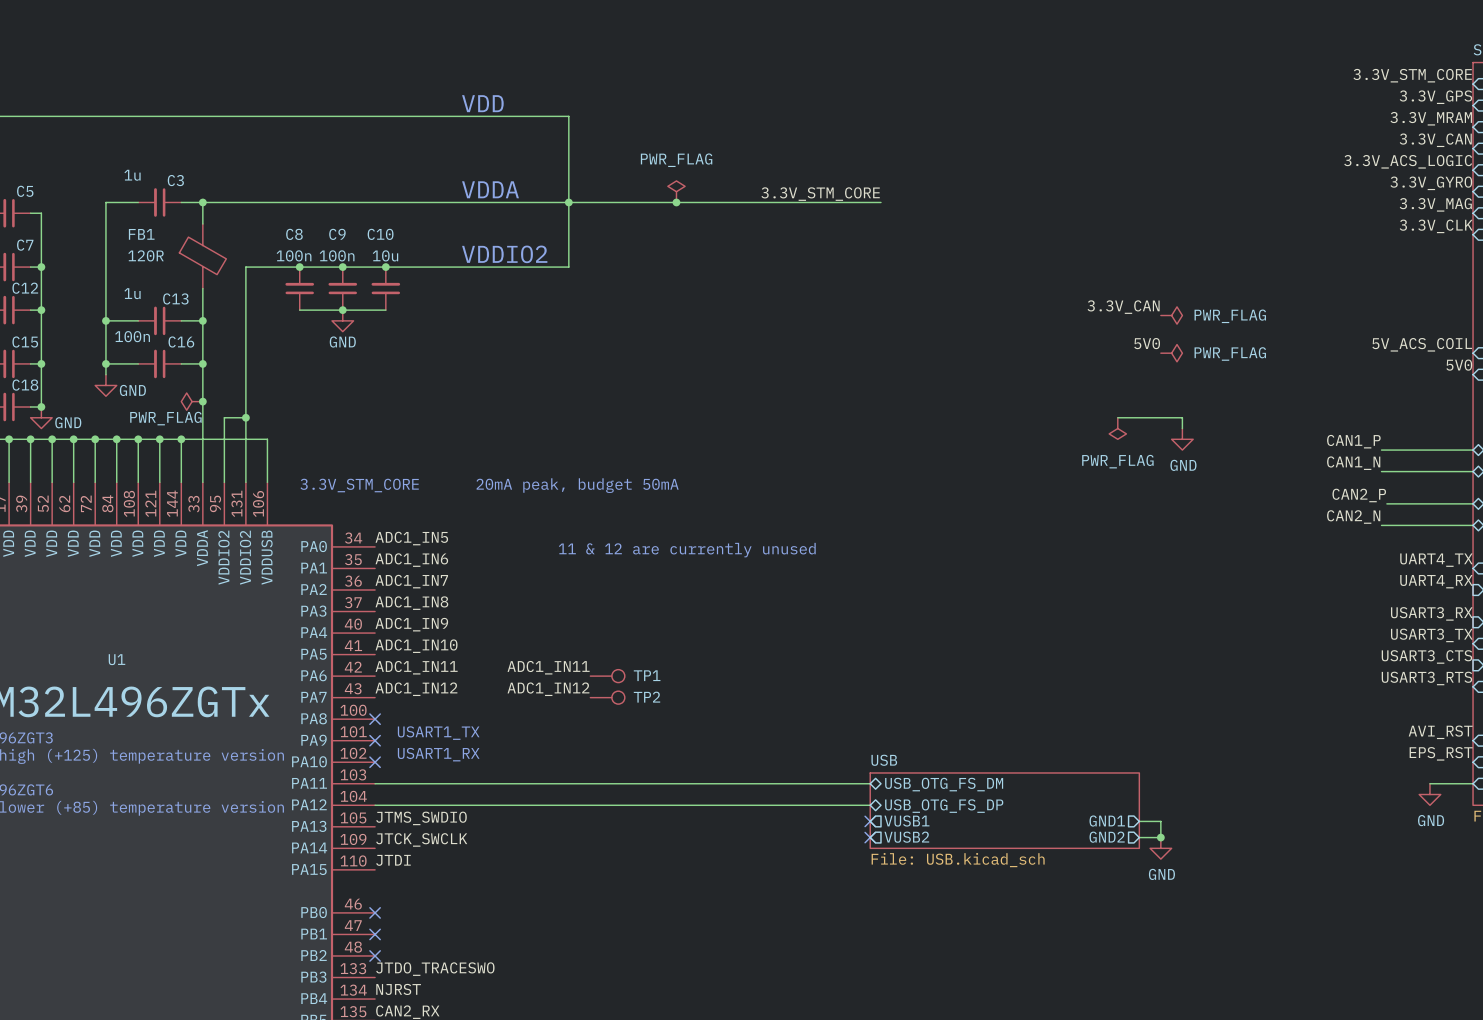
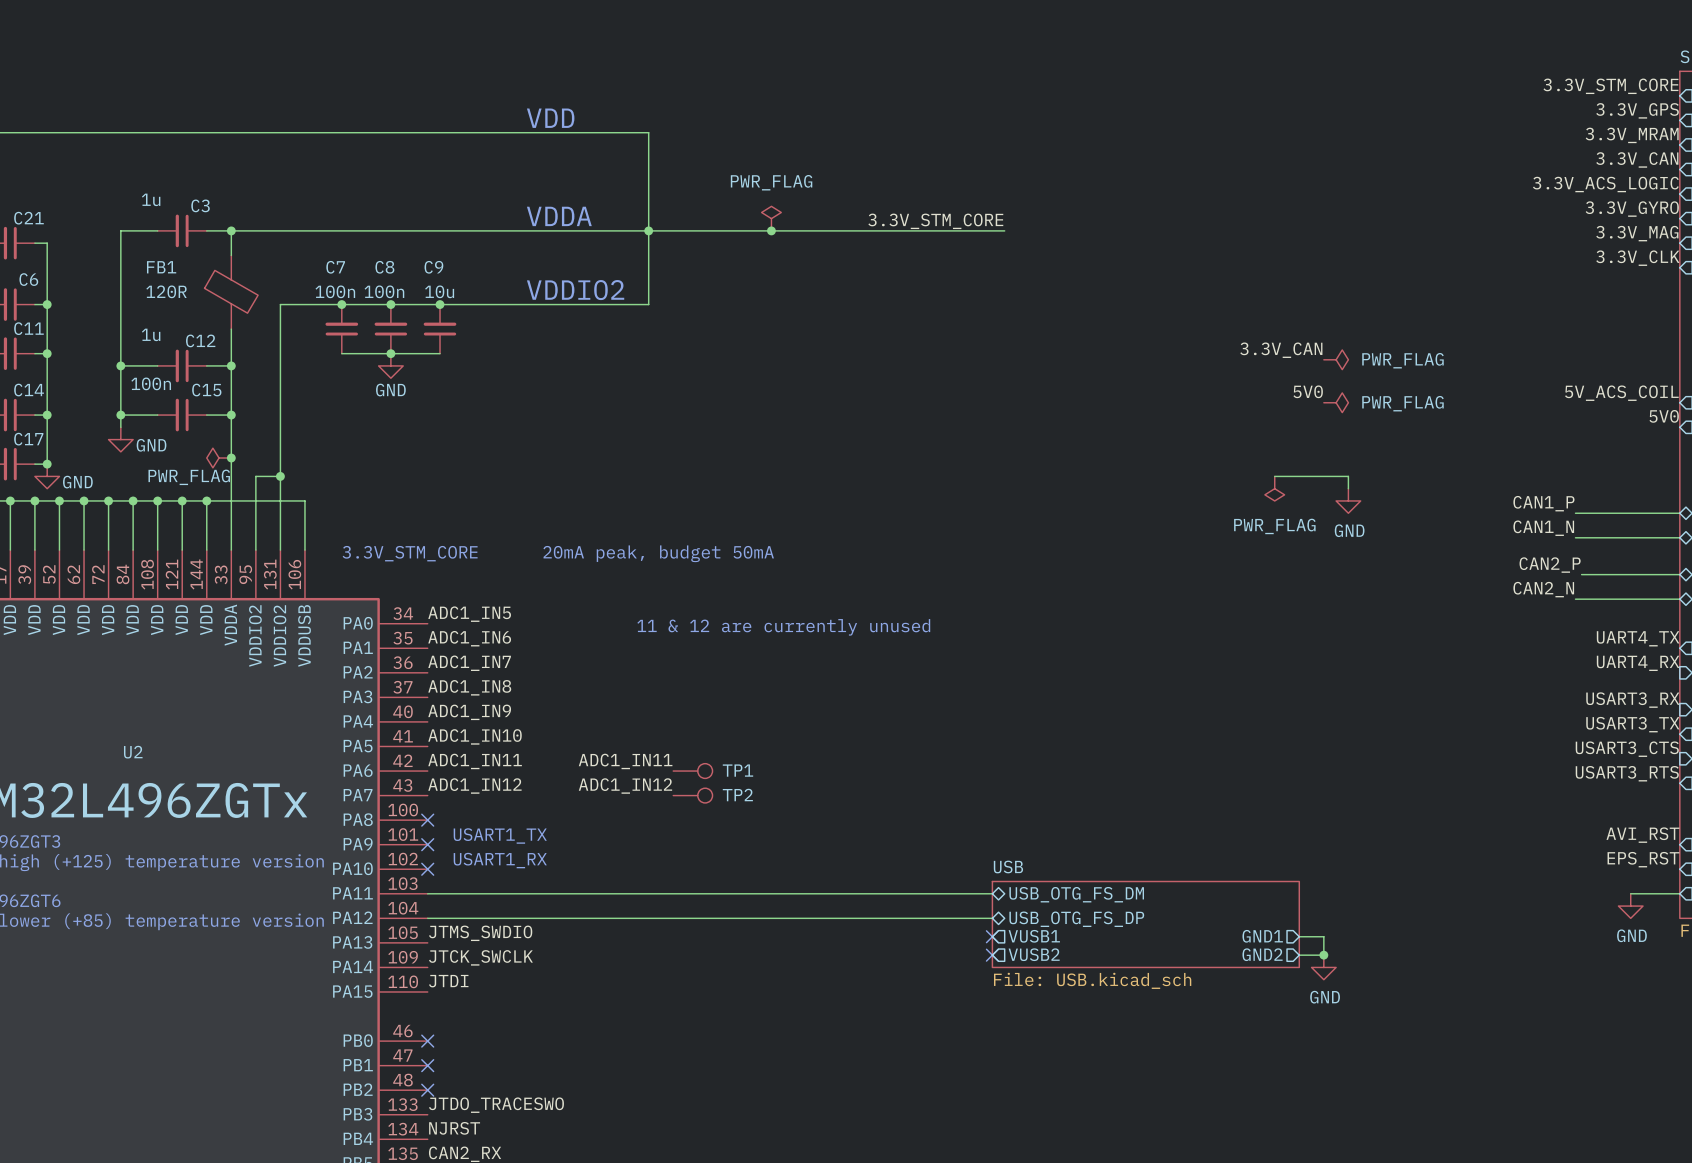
C5 name: C5 (25, 191) -> C21 (28, 218)
C8 name: C8 (294, 234) -> C7 (335, 267)
C9 name: C9 (337, 234) -> C8 (384, 267)
C10 name: C10 (380, 234) -> C9 (433, 267)
C7 name: C7 (25, 245) -> C6 (28, 279)
C12 name: C12 (25, 288) -> C11 (28, 328)
C13 name: C13 (175, 298) -> C12 (200, 340)
C15 name: C15 (25, 342) -> C14 (29, 390)
C16 name: C16 (181, 342) -> C15 (206, 390)
C18 name: C18 (25, 385) -> C17 (28, 439)
U1 name: U1 (116, 659) -> U2 (133, 752)

